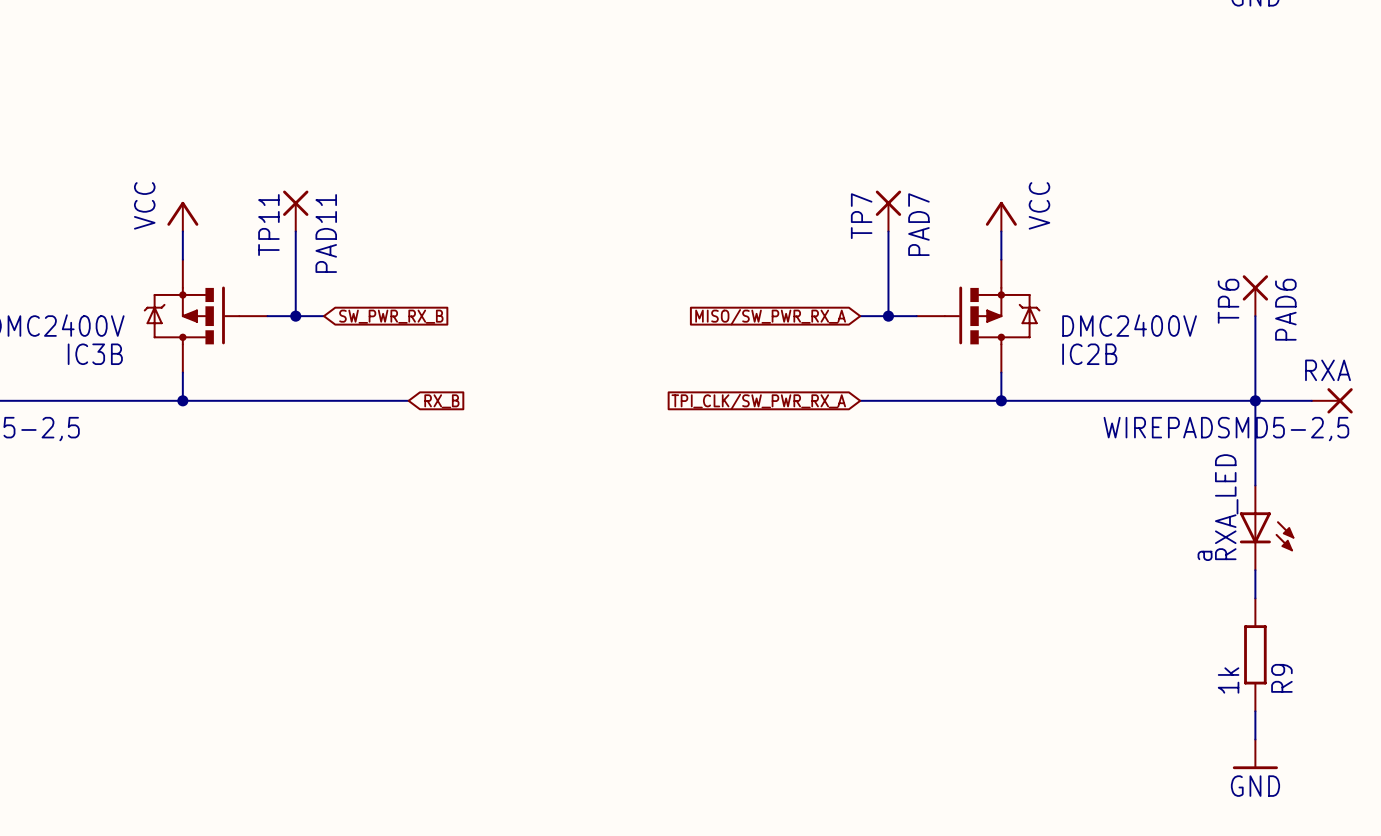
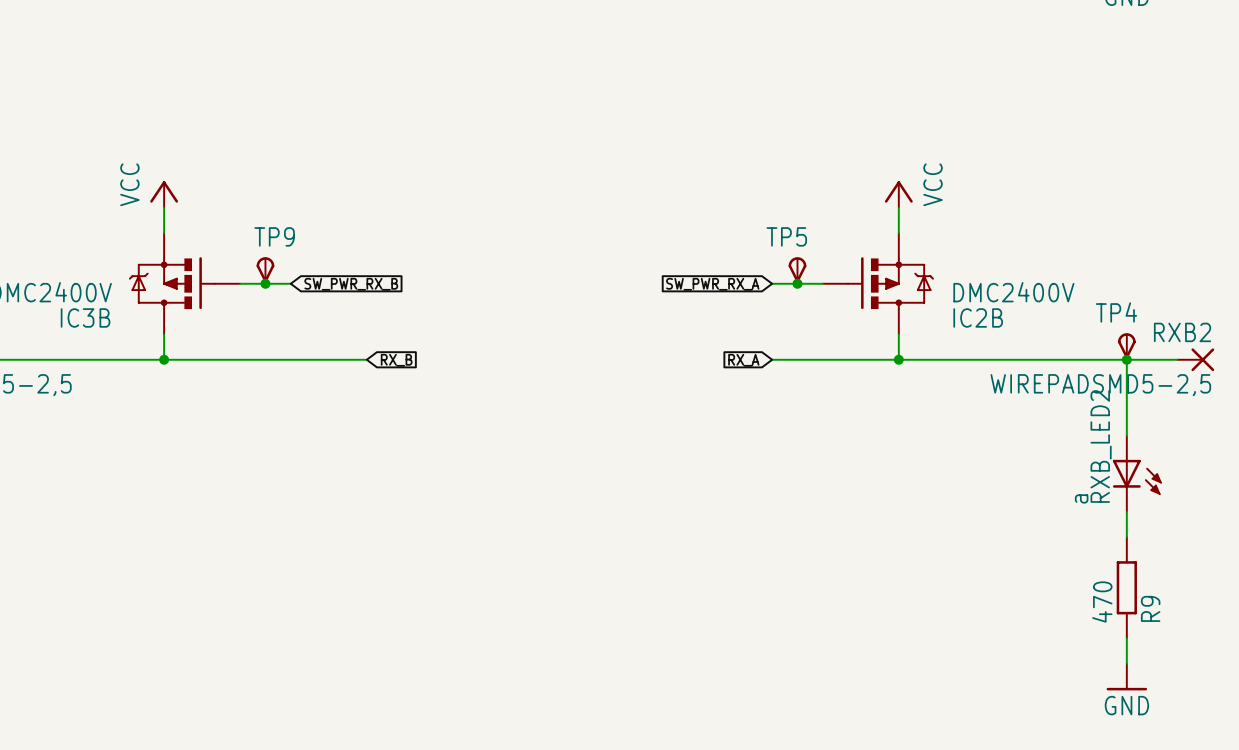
PAD11: TP11 (295, 211) -> none
PAD7: TP7 (888, 211) -> none
wire: (295, 231) (295, 316) -> none
wire: (888, 231) (888, 316) -> none
PAD6: TP6 (1255, 295) -> none
TP9: none -> (265, 270)
TP5: none -> (797, 270)
wire: (1255, 316) (1255, 400) -> none
global label: MISO/SW_PWR_RX_A (770, 317) -> SW_PWR_RX_A (712, 284)
RXA name: RXA (1328, 370) -> RXB2 (1182, 332)
TP4: none -> (1126, 346)
global label: TPI_CLK/SW_PWR_RX_A (758, 401) -> RX_A (743, 360)
RXA_LED name: RXA_LED (1226, 507) -> RXB_LED2 (1101, 446)
R9 value: 1k (1228, 680) -> 470 (1102, 602)

